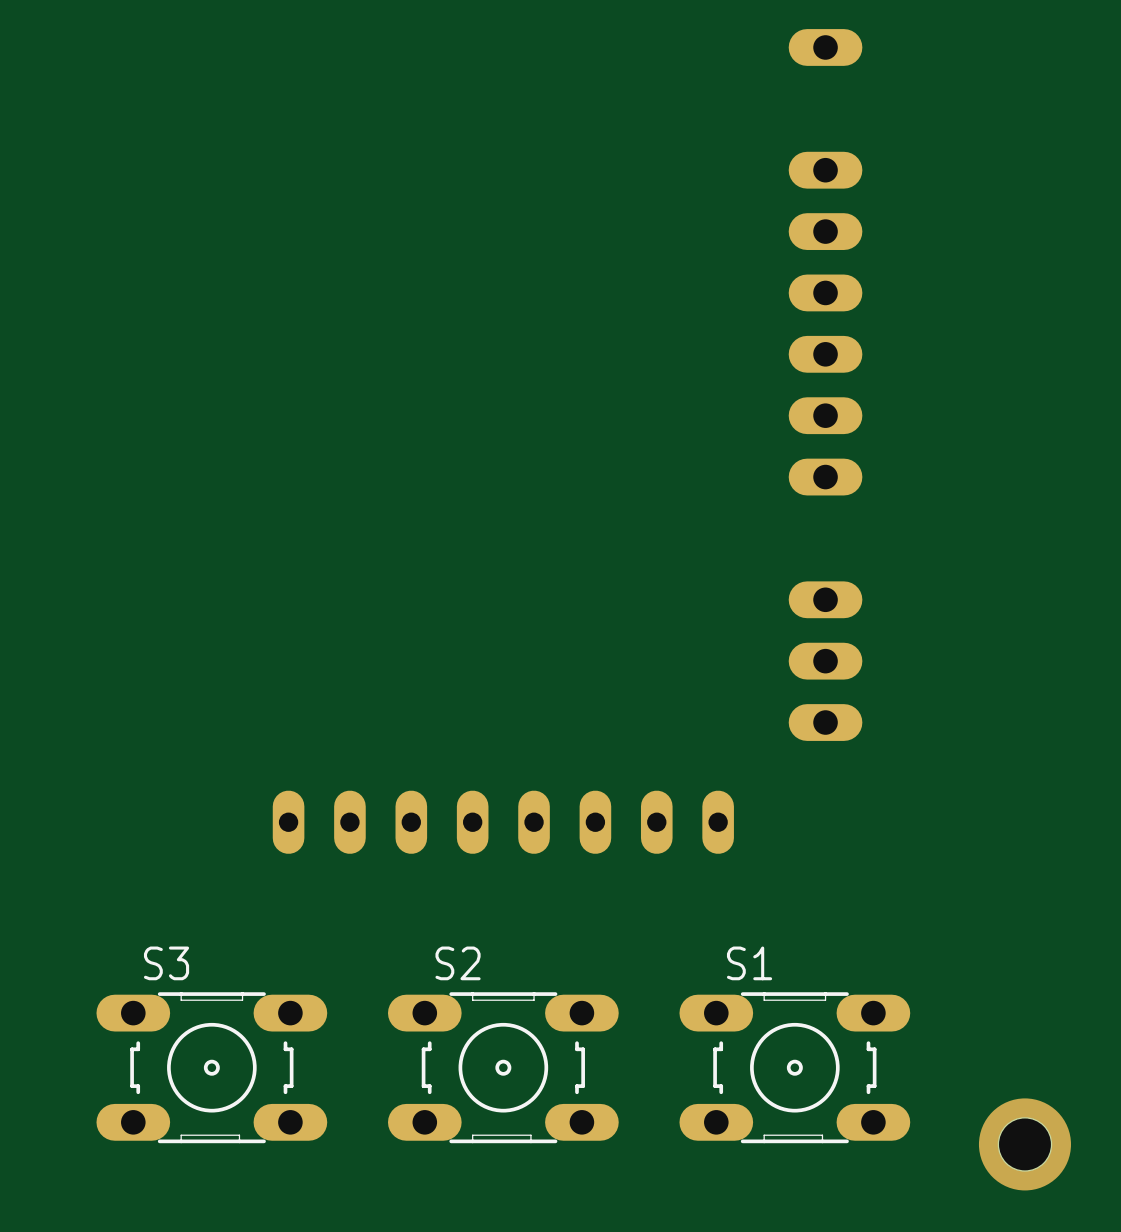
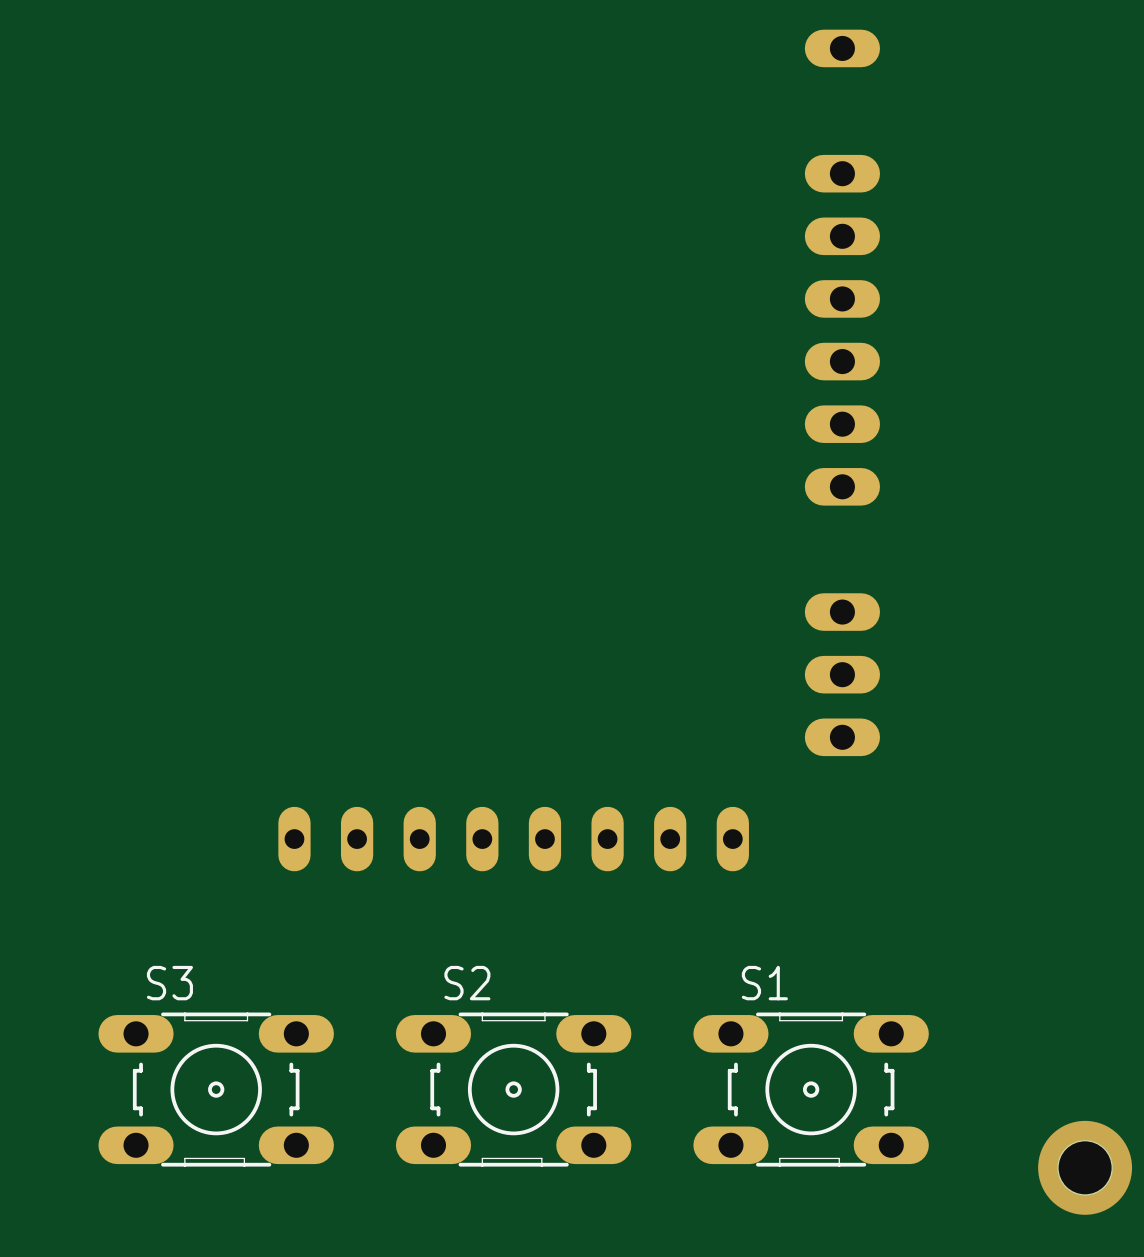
hole position: (1024, 1144) -> (1085, 1167)
via position: (1024, 1144) -> (1085, 1167)

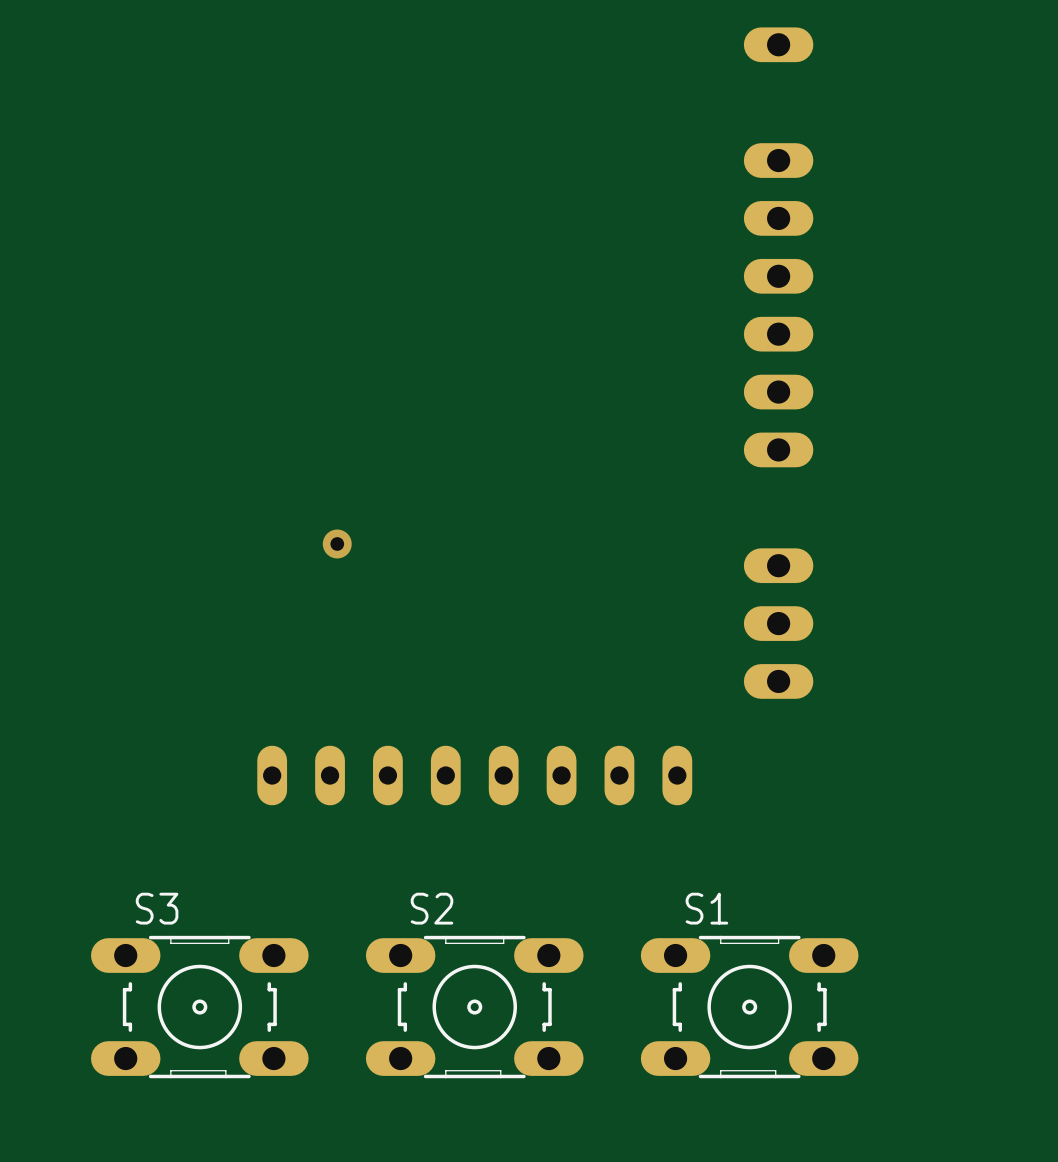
via: none -> (337, 543)
hole: (1085, 1167) -> none
via: (1085, 1167) -> none

